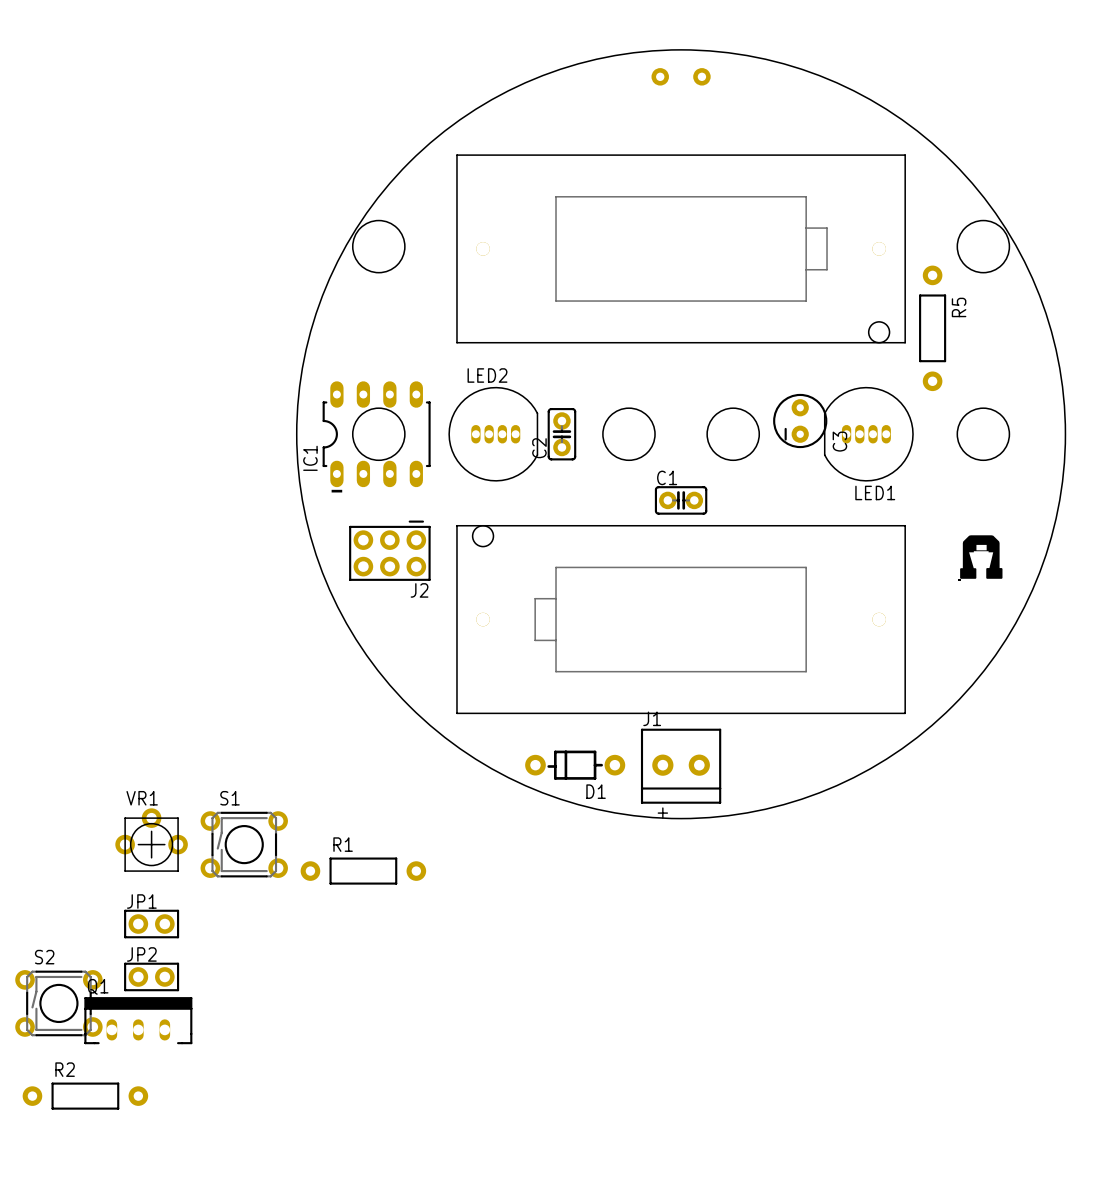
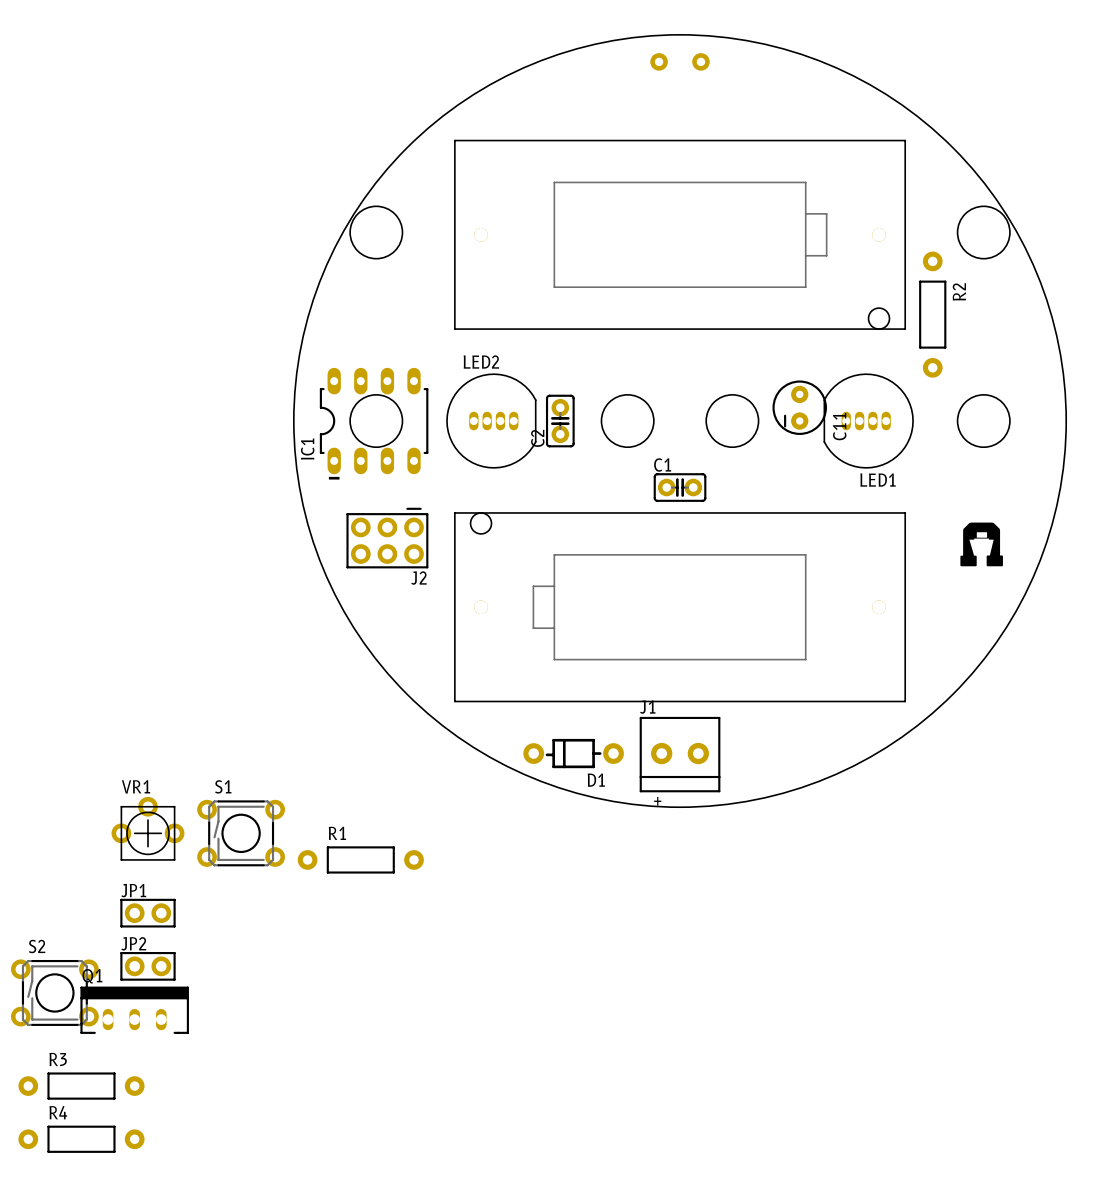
R5 name: R5 (959, 307) -> R2 (959, 291)
C3 name: C3 (839, 441) -> C11 (839, 426)
R2 name: R2 (65, 1069) -> R3 (58, 1059)
R4: none -> (81, 1139)

